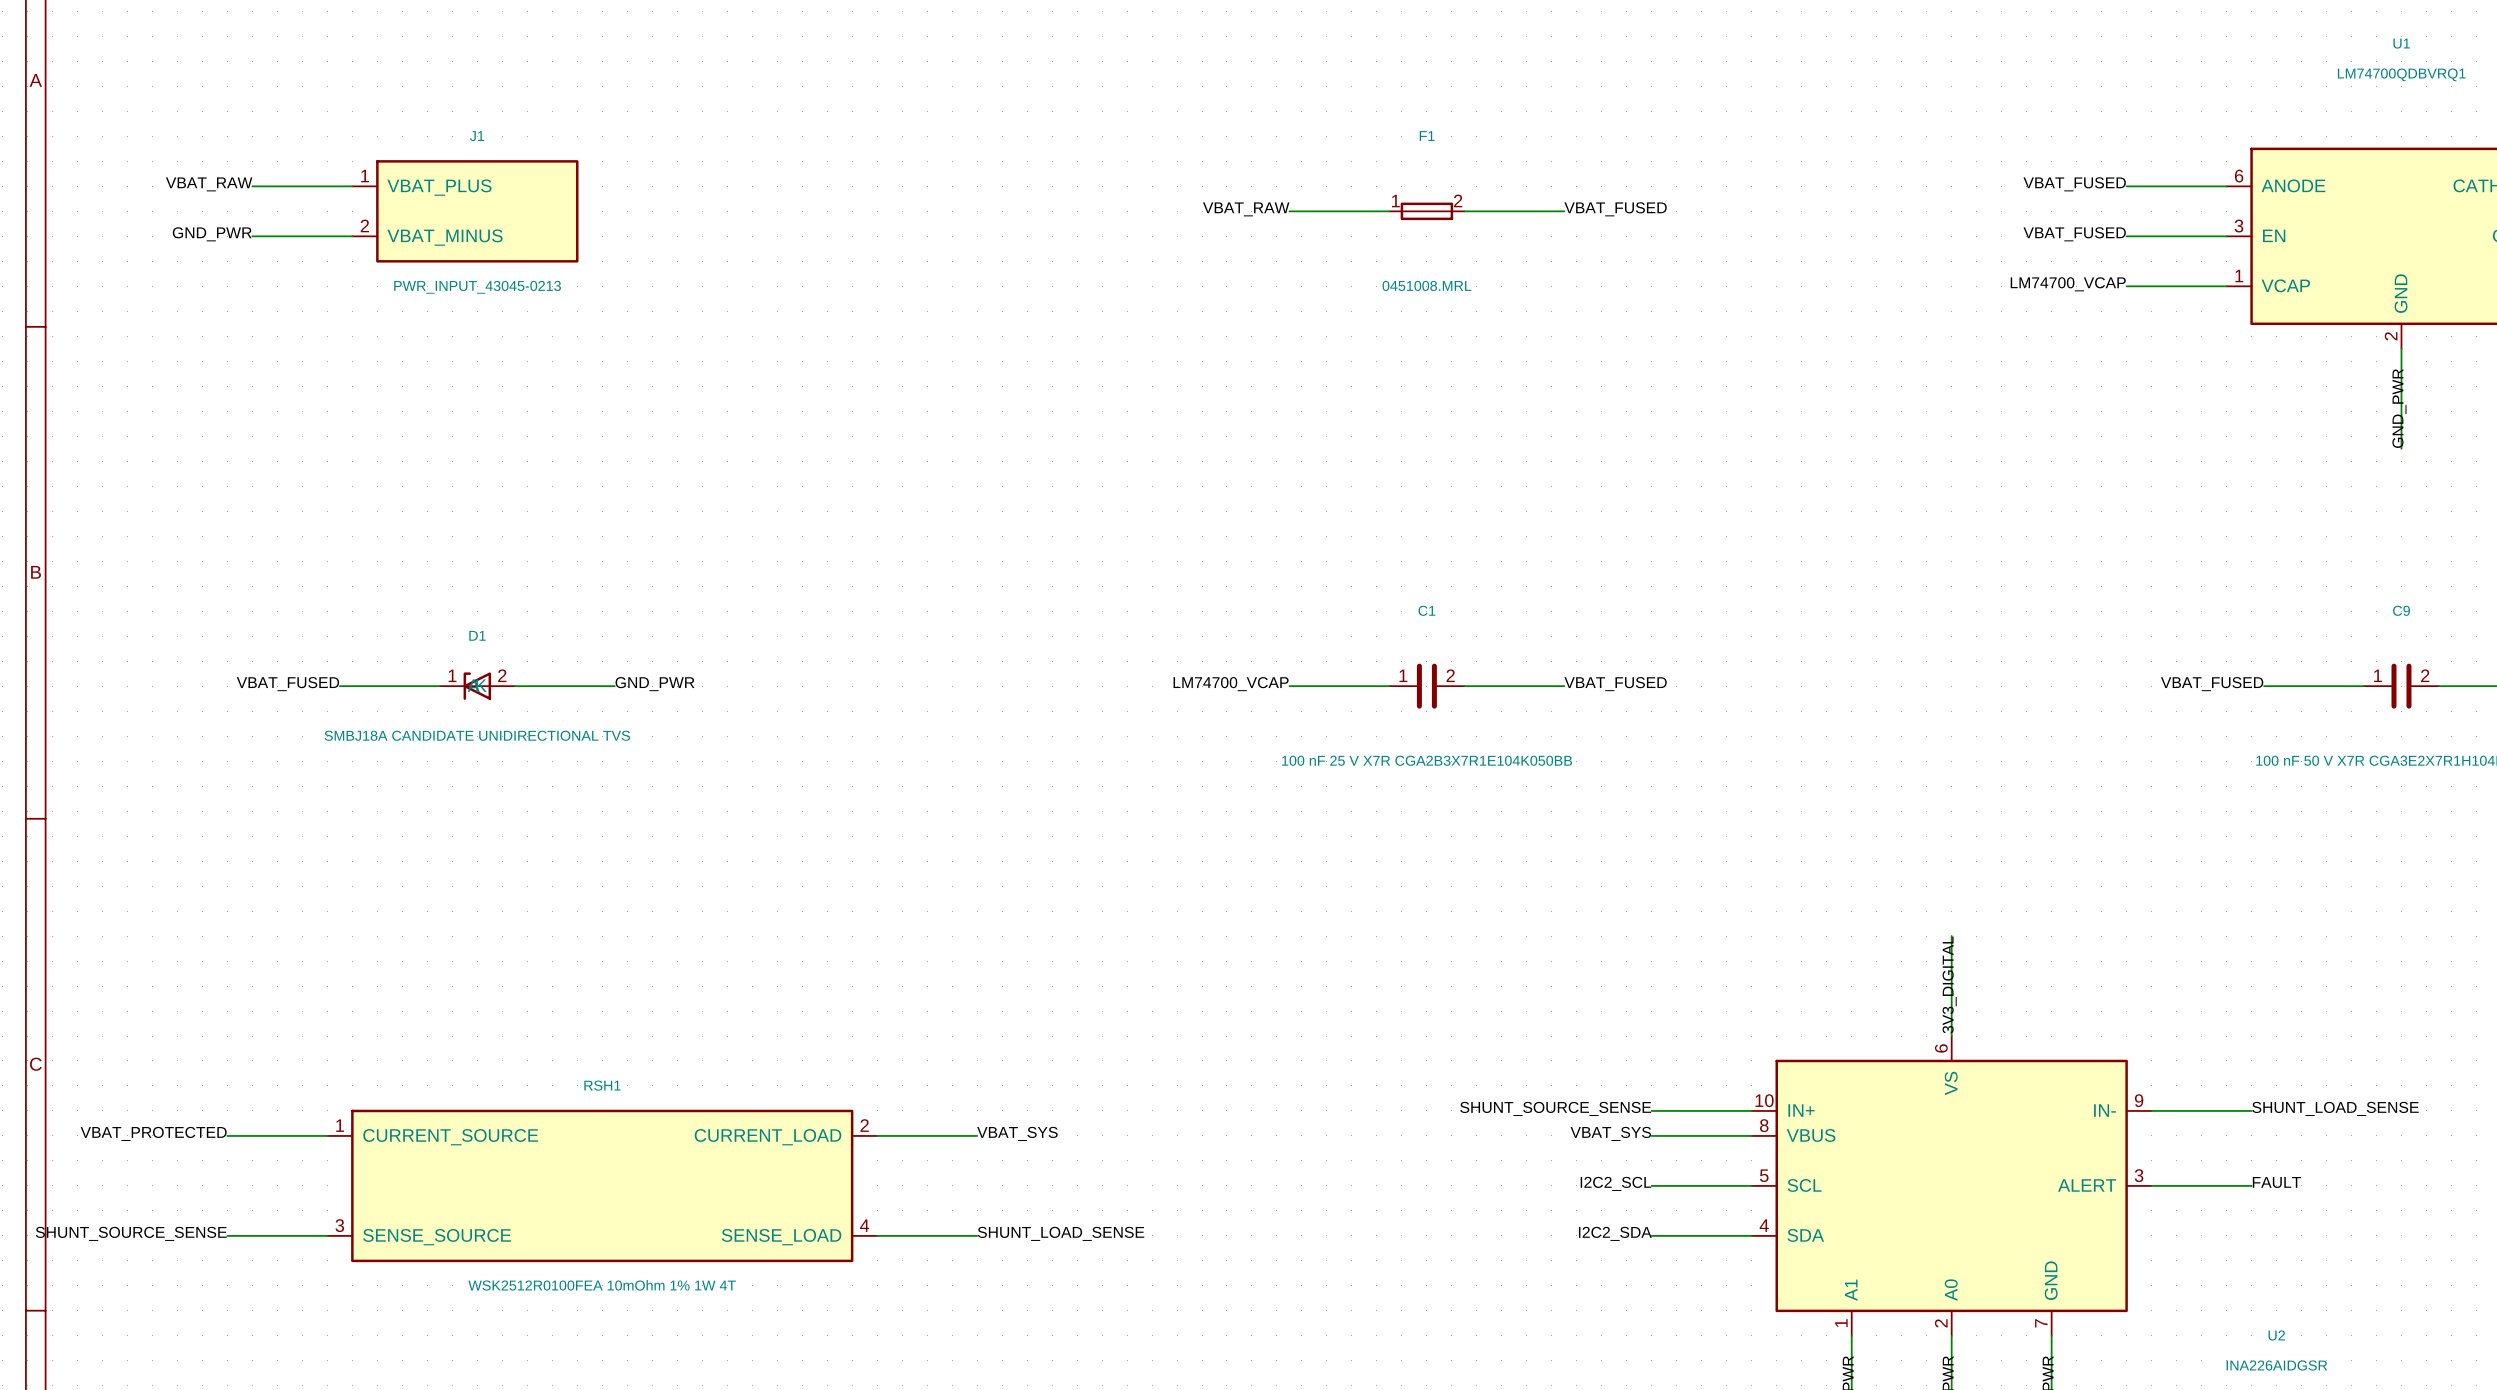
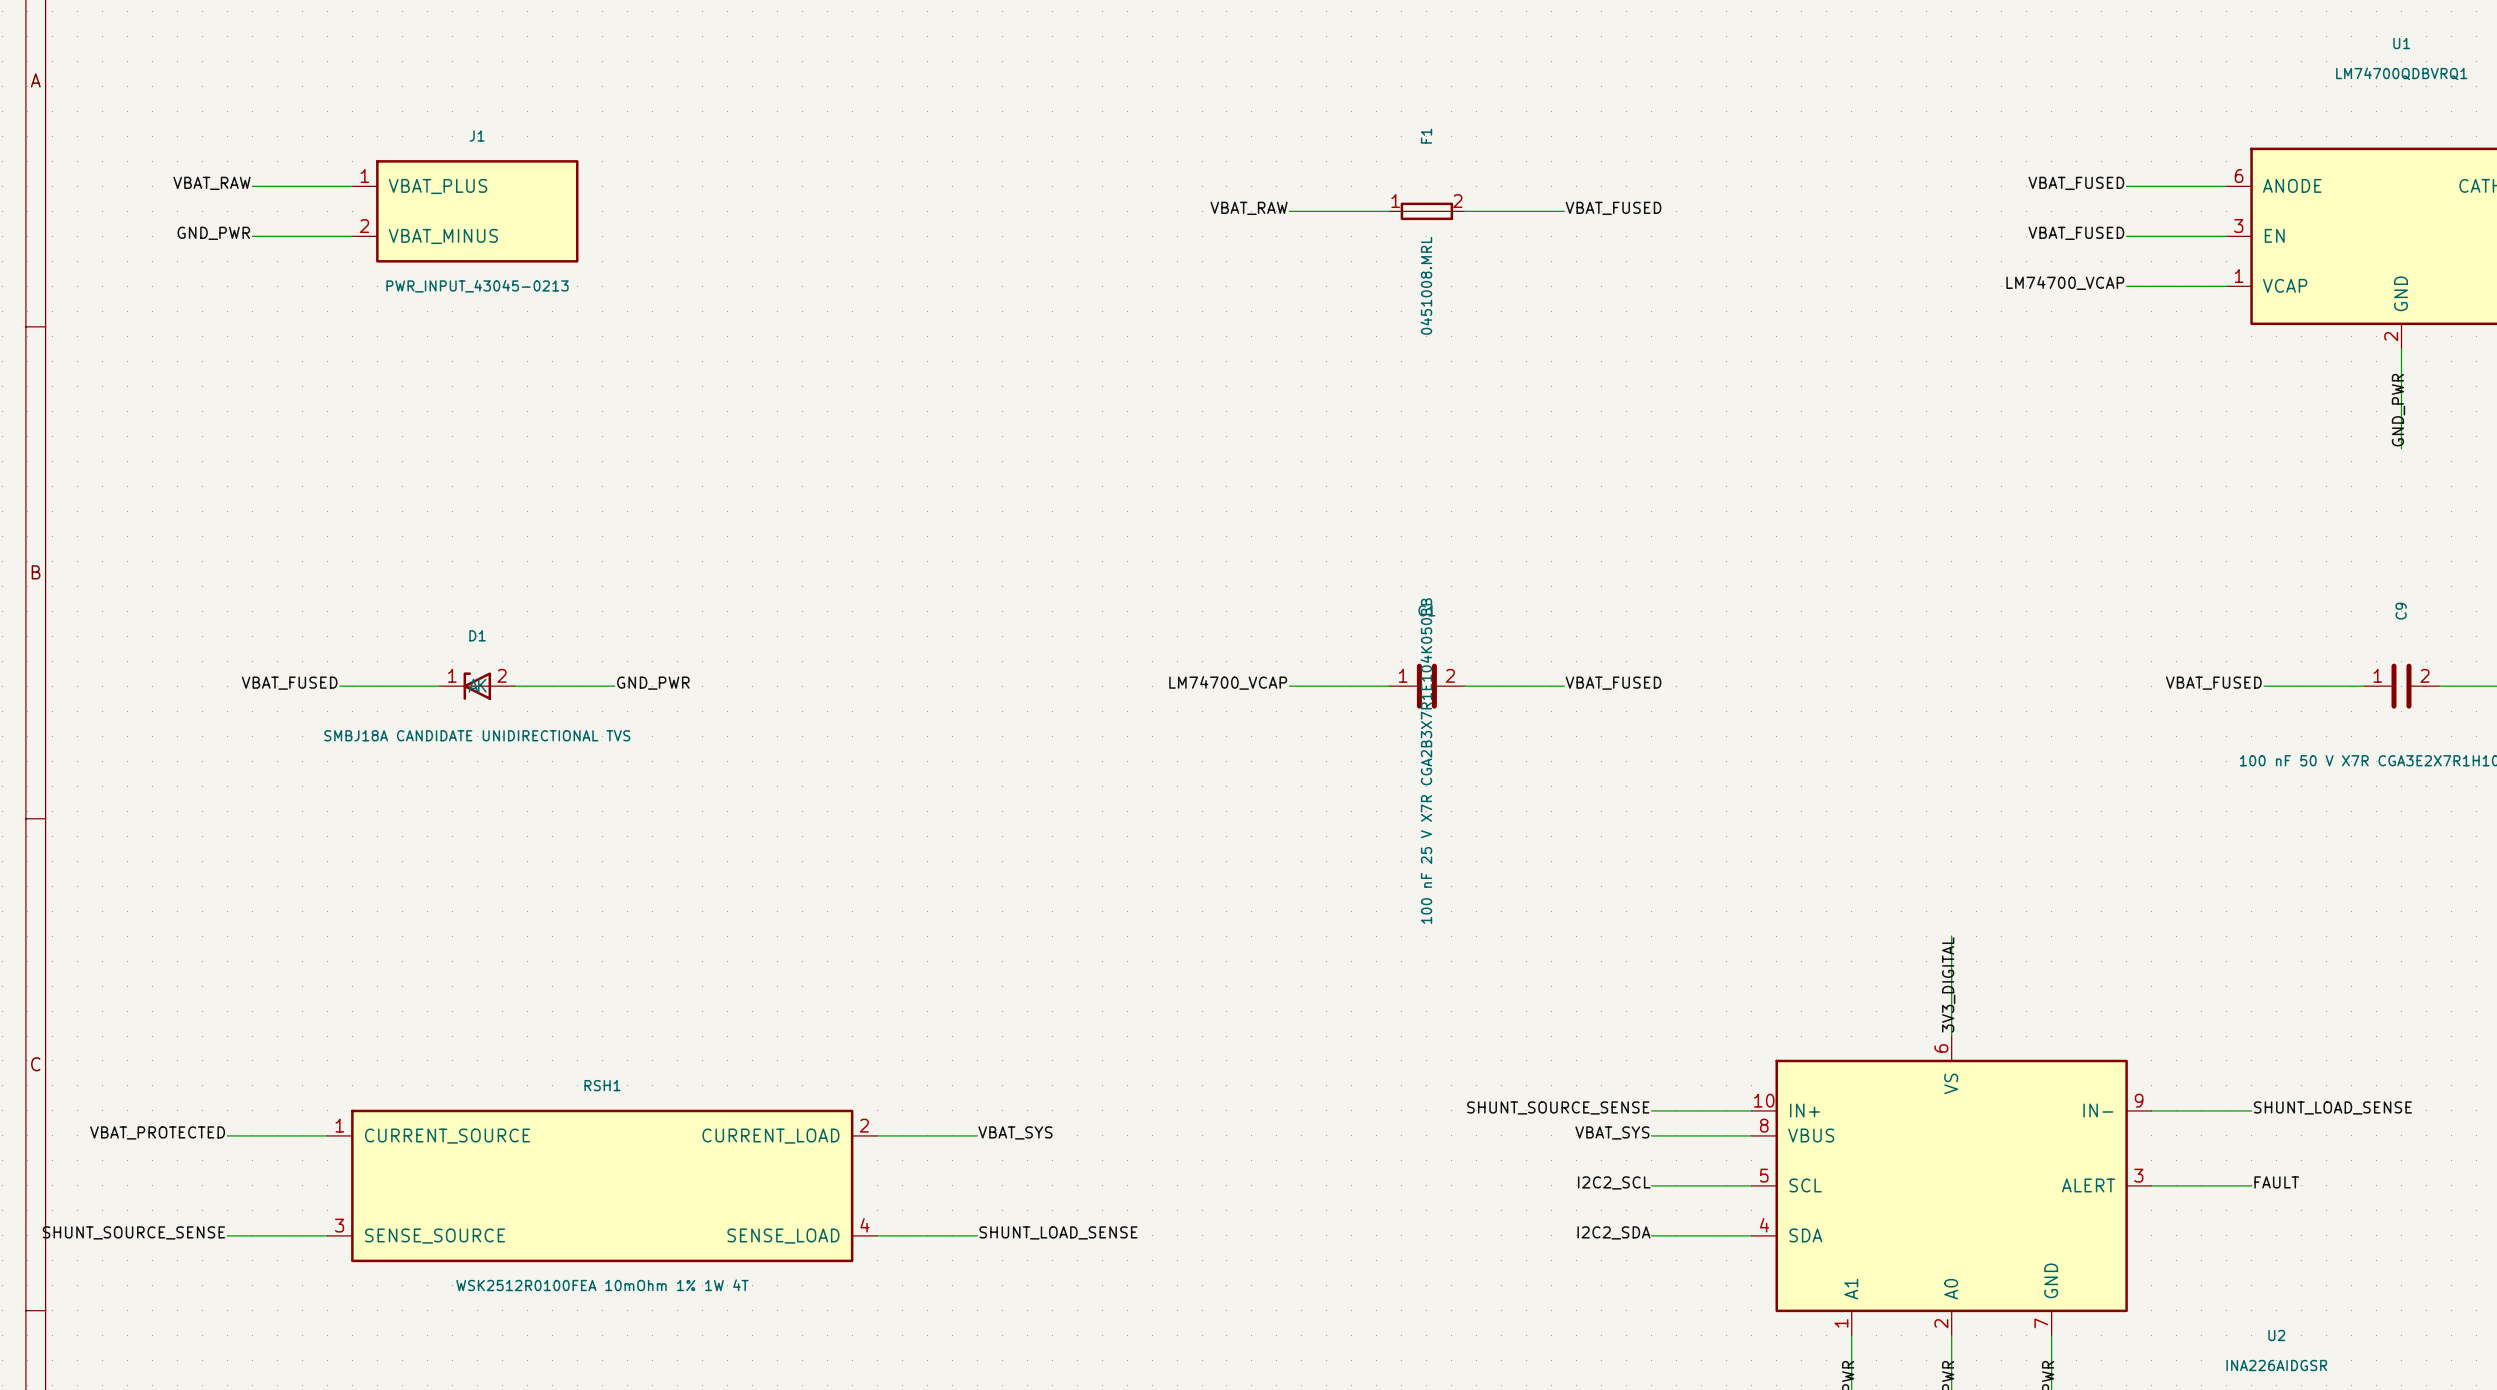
F1 name rotation: 0° (1427, 136) -> 90° counterclockwise (1426, 136)
F1 value rotation: 0° (1426, 285) -> 90° counterclockwise (1426, 285)
C9 name rotation: 0° (2401, 610) -> 90° counterclockwise (2401, 611)
C1 value rotation: 0° (1427, 760) -> 90° counterclockwise (1426, 761)

